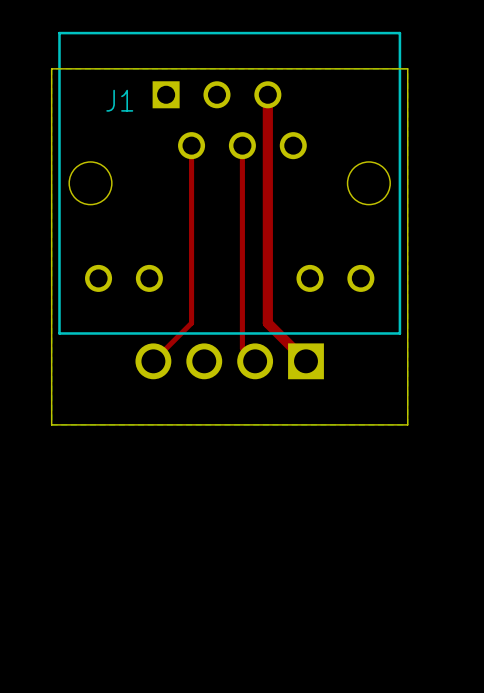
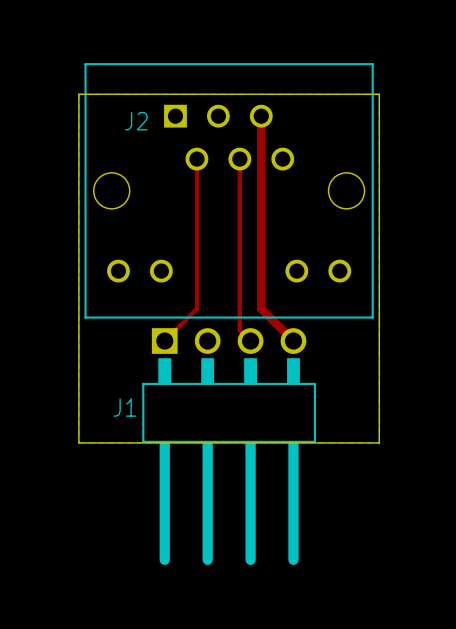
J1 name: J1 (119, 100) -> J2 (136, 121)
part: (229, 361) -> none
board edge: (51, 424) (407, 424) -> (78, 394) (78, 442) (379, 442) (379, 394)
J1: none -> (229, 446)

